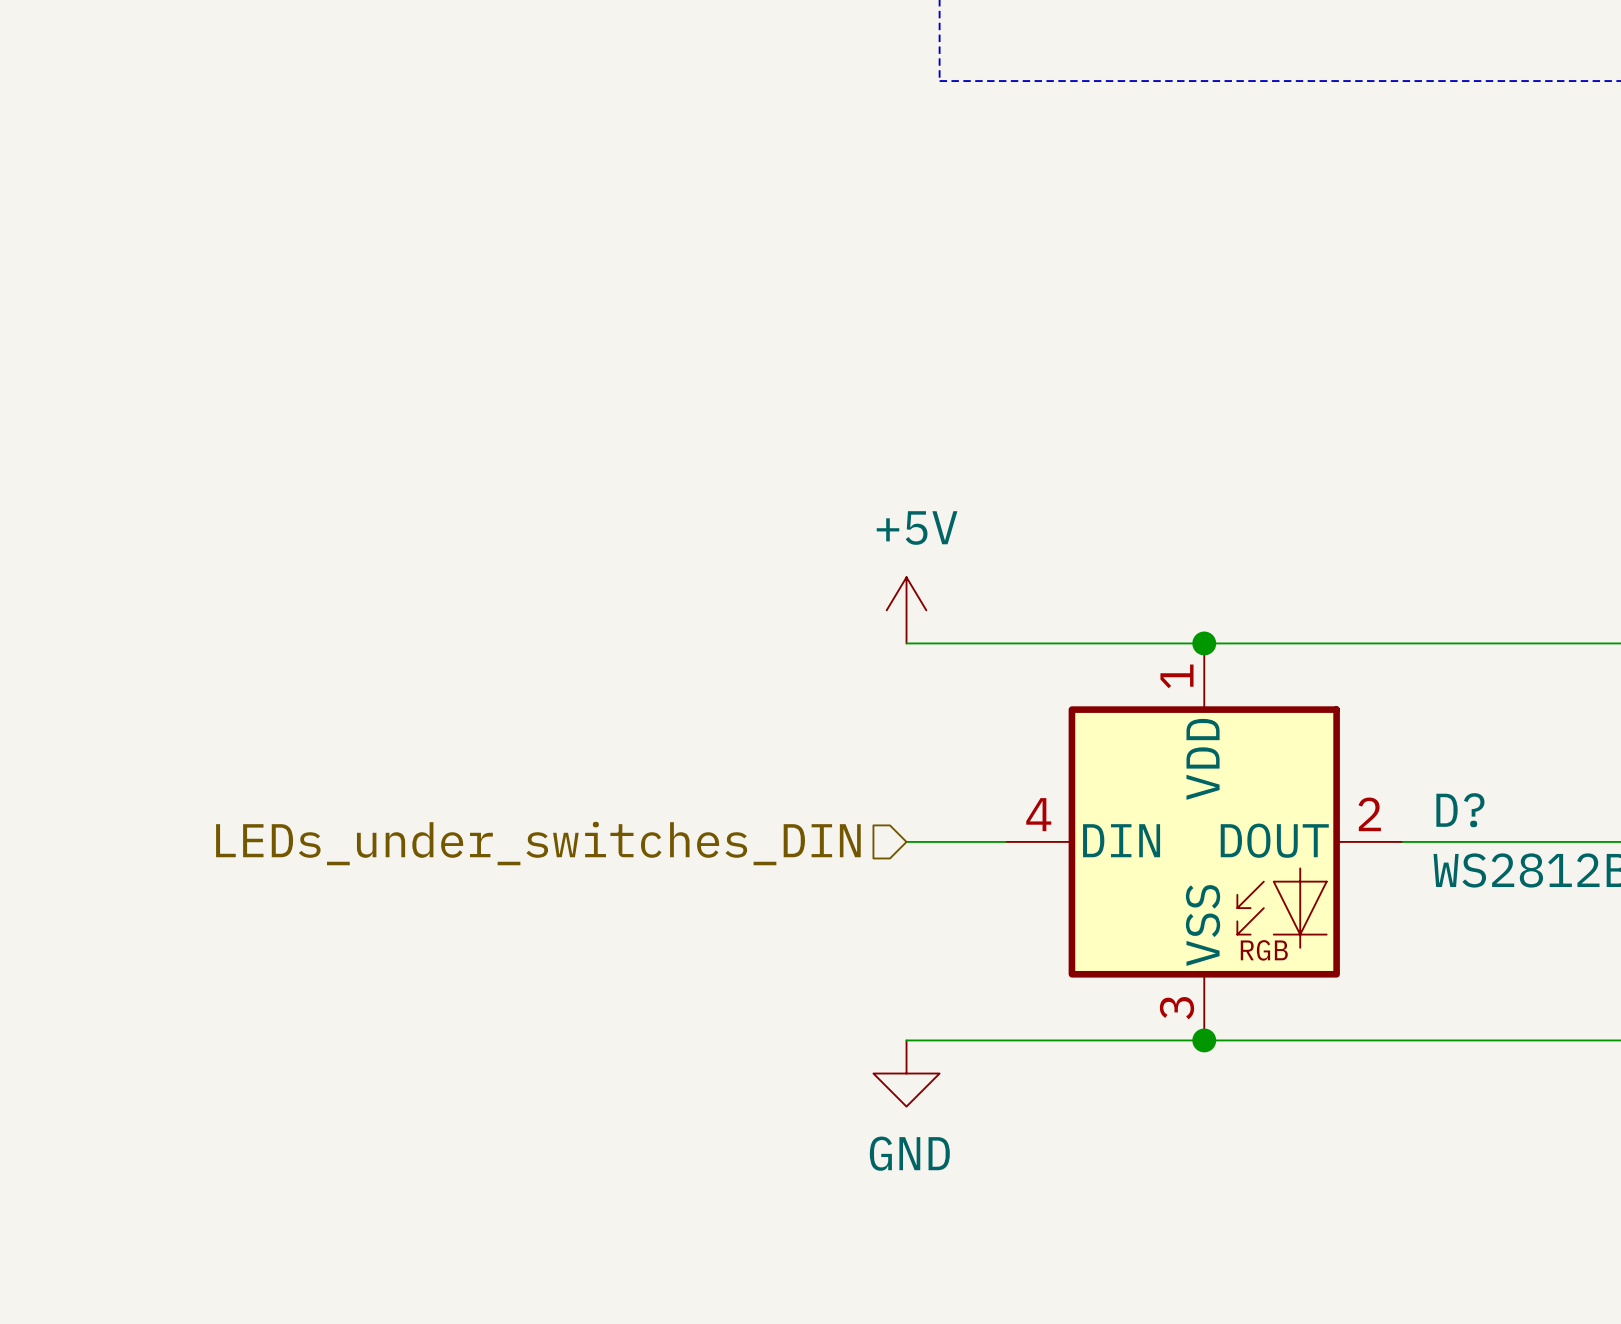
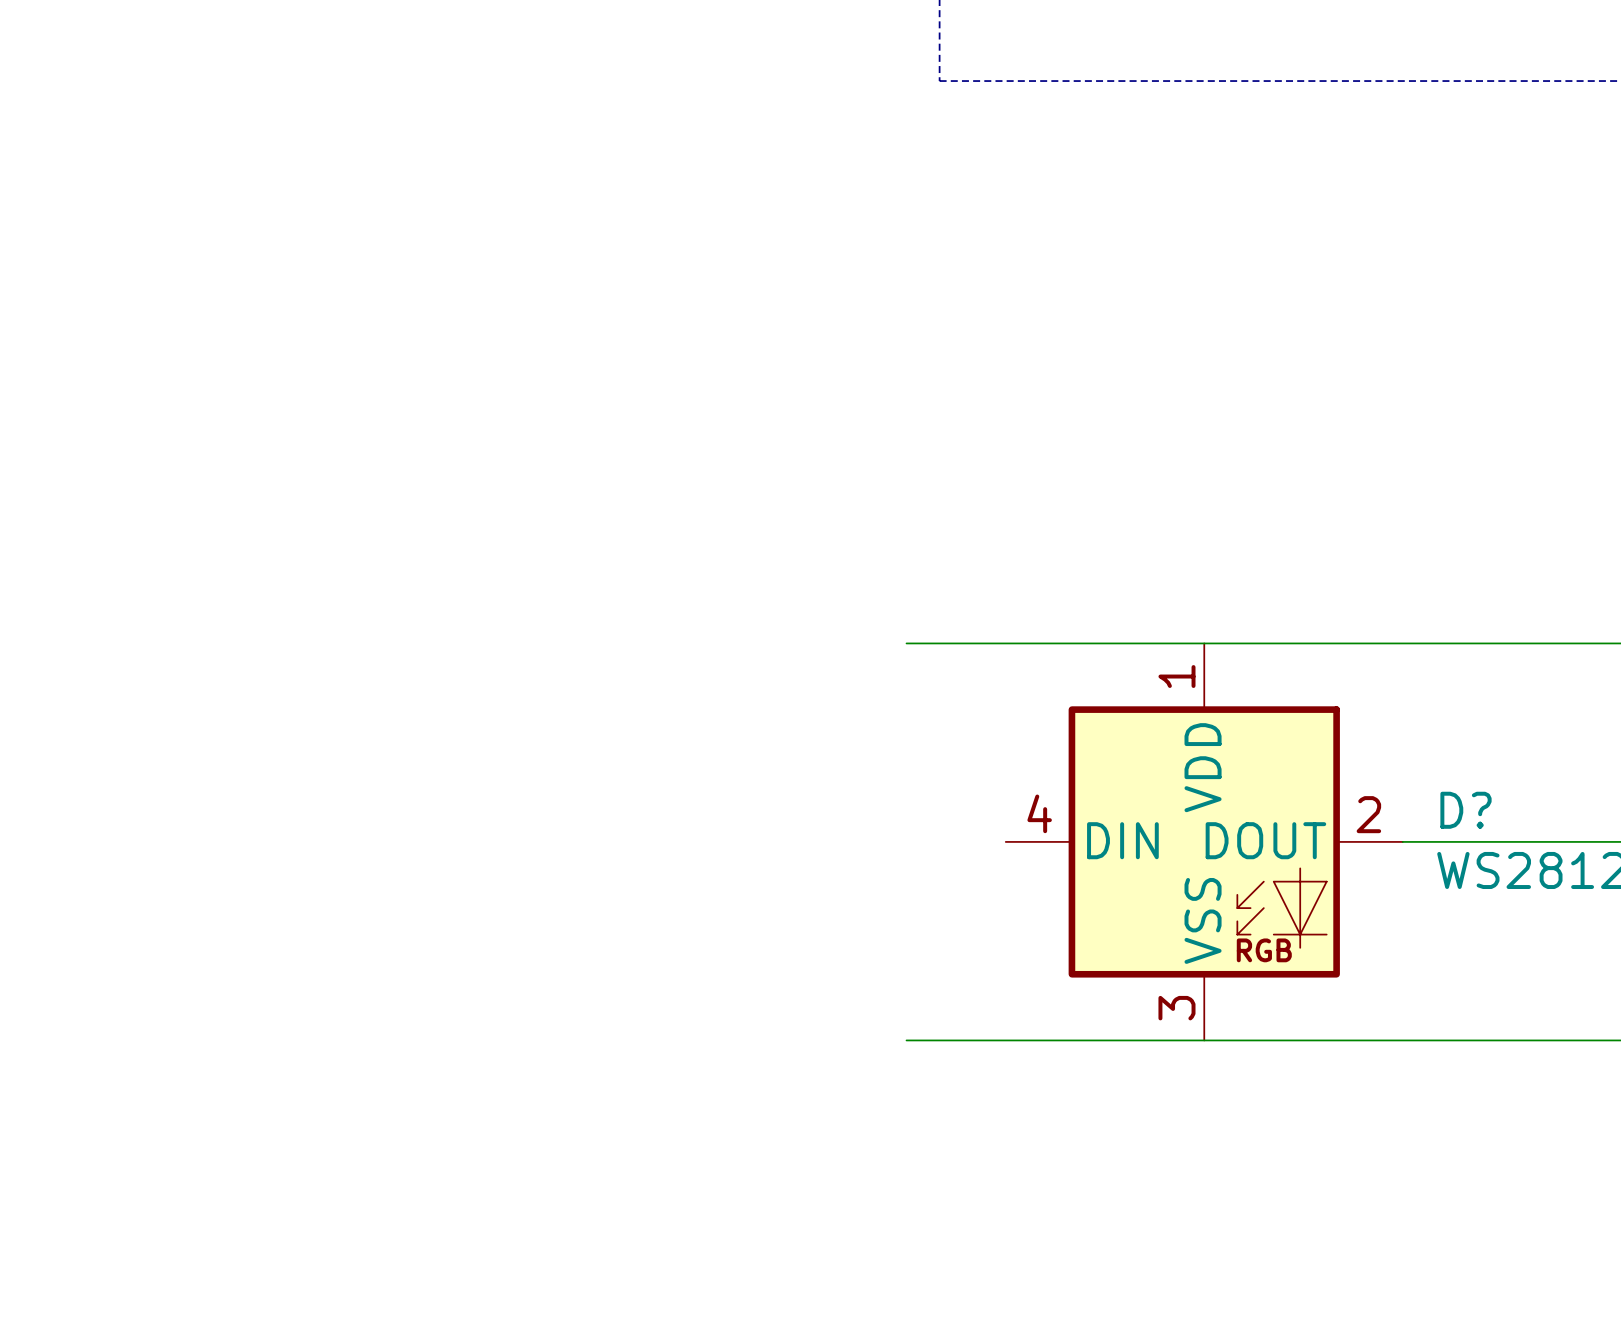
power symbol: +5V (906, 610) -> none
junction: (1204, 643) -> none
wire: (906, 841) (1005, 841) -> none
hierarchical label: LEDs_under_switches_DIN (538, 843) -> none
junction: (1204, 1040) -> none
power symbol: GND (906, 1073) -> none

